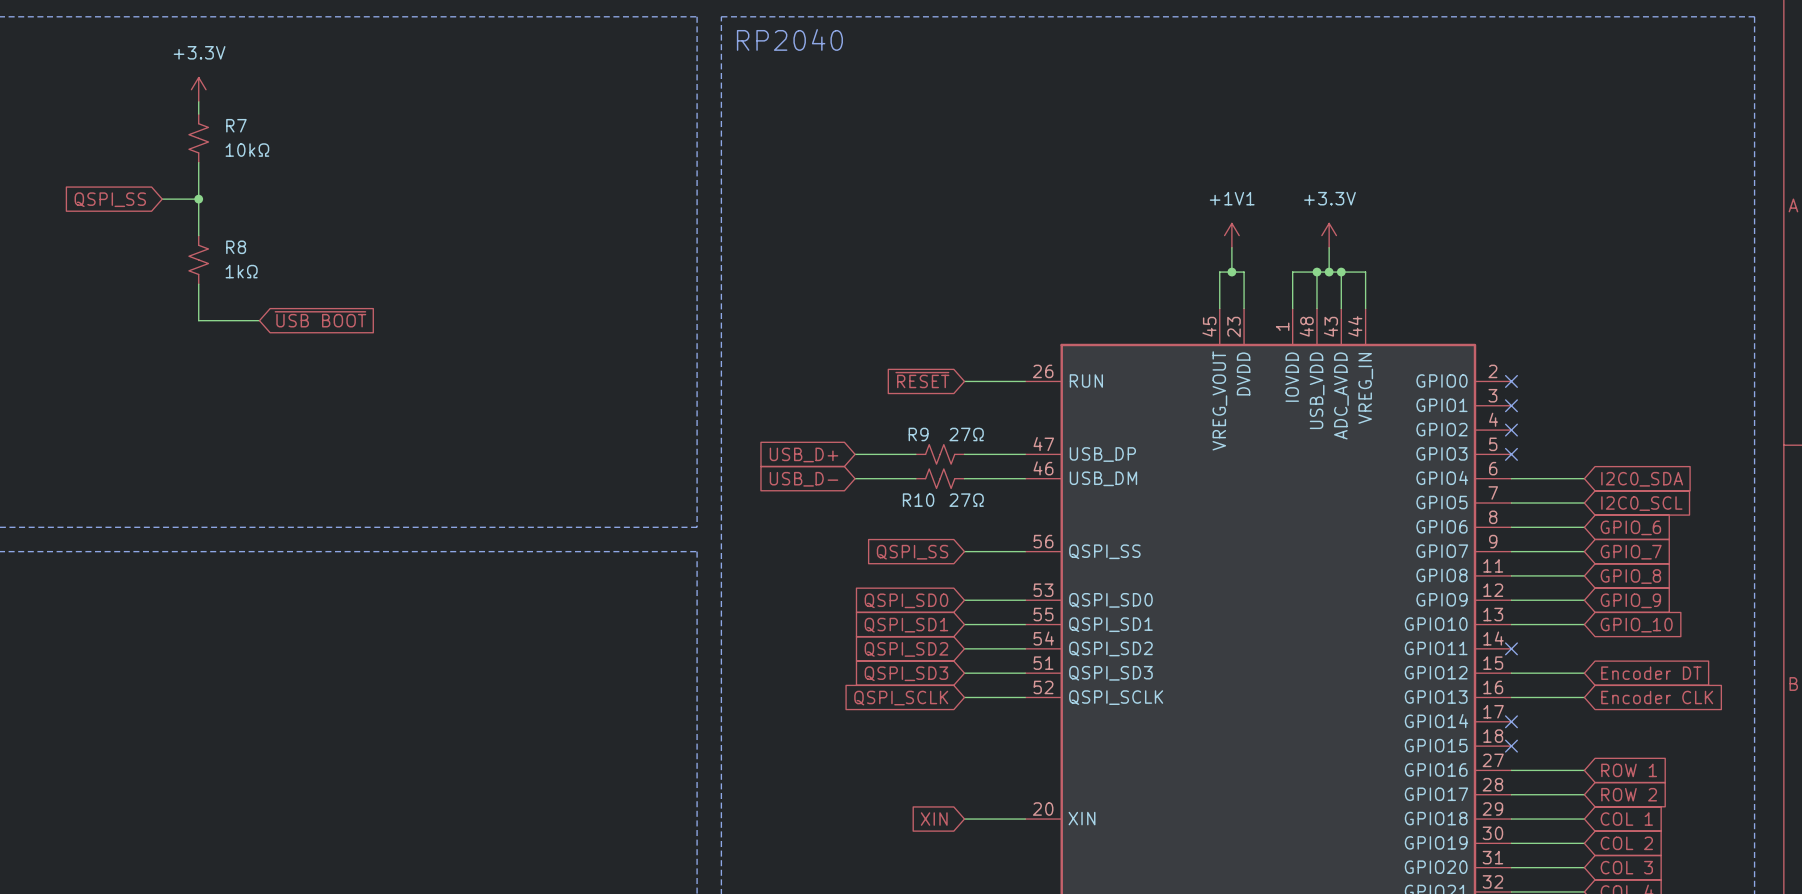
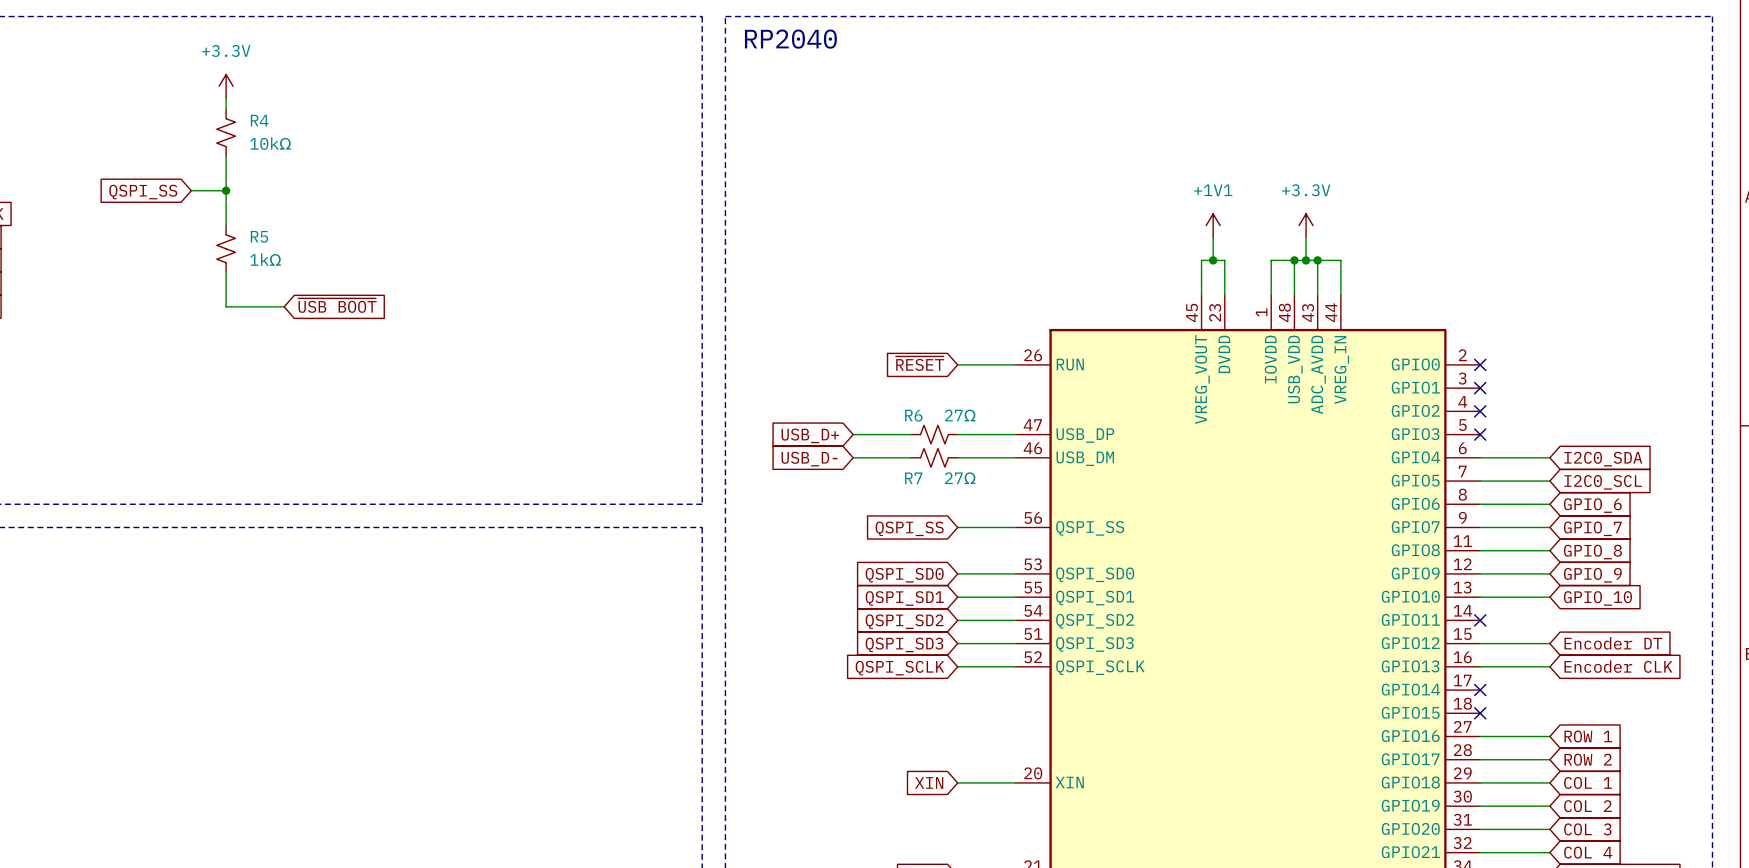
R7 name: R7 (236, 125) -> R4 (259, 120)
R8 name: R8 (236, 247) -> R5 (259, 236)
R9 name: R9 (918, 434) -> R6 (913, 415)
R10 name: R10 (918, 500) -> R7 (913, 478)

